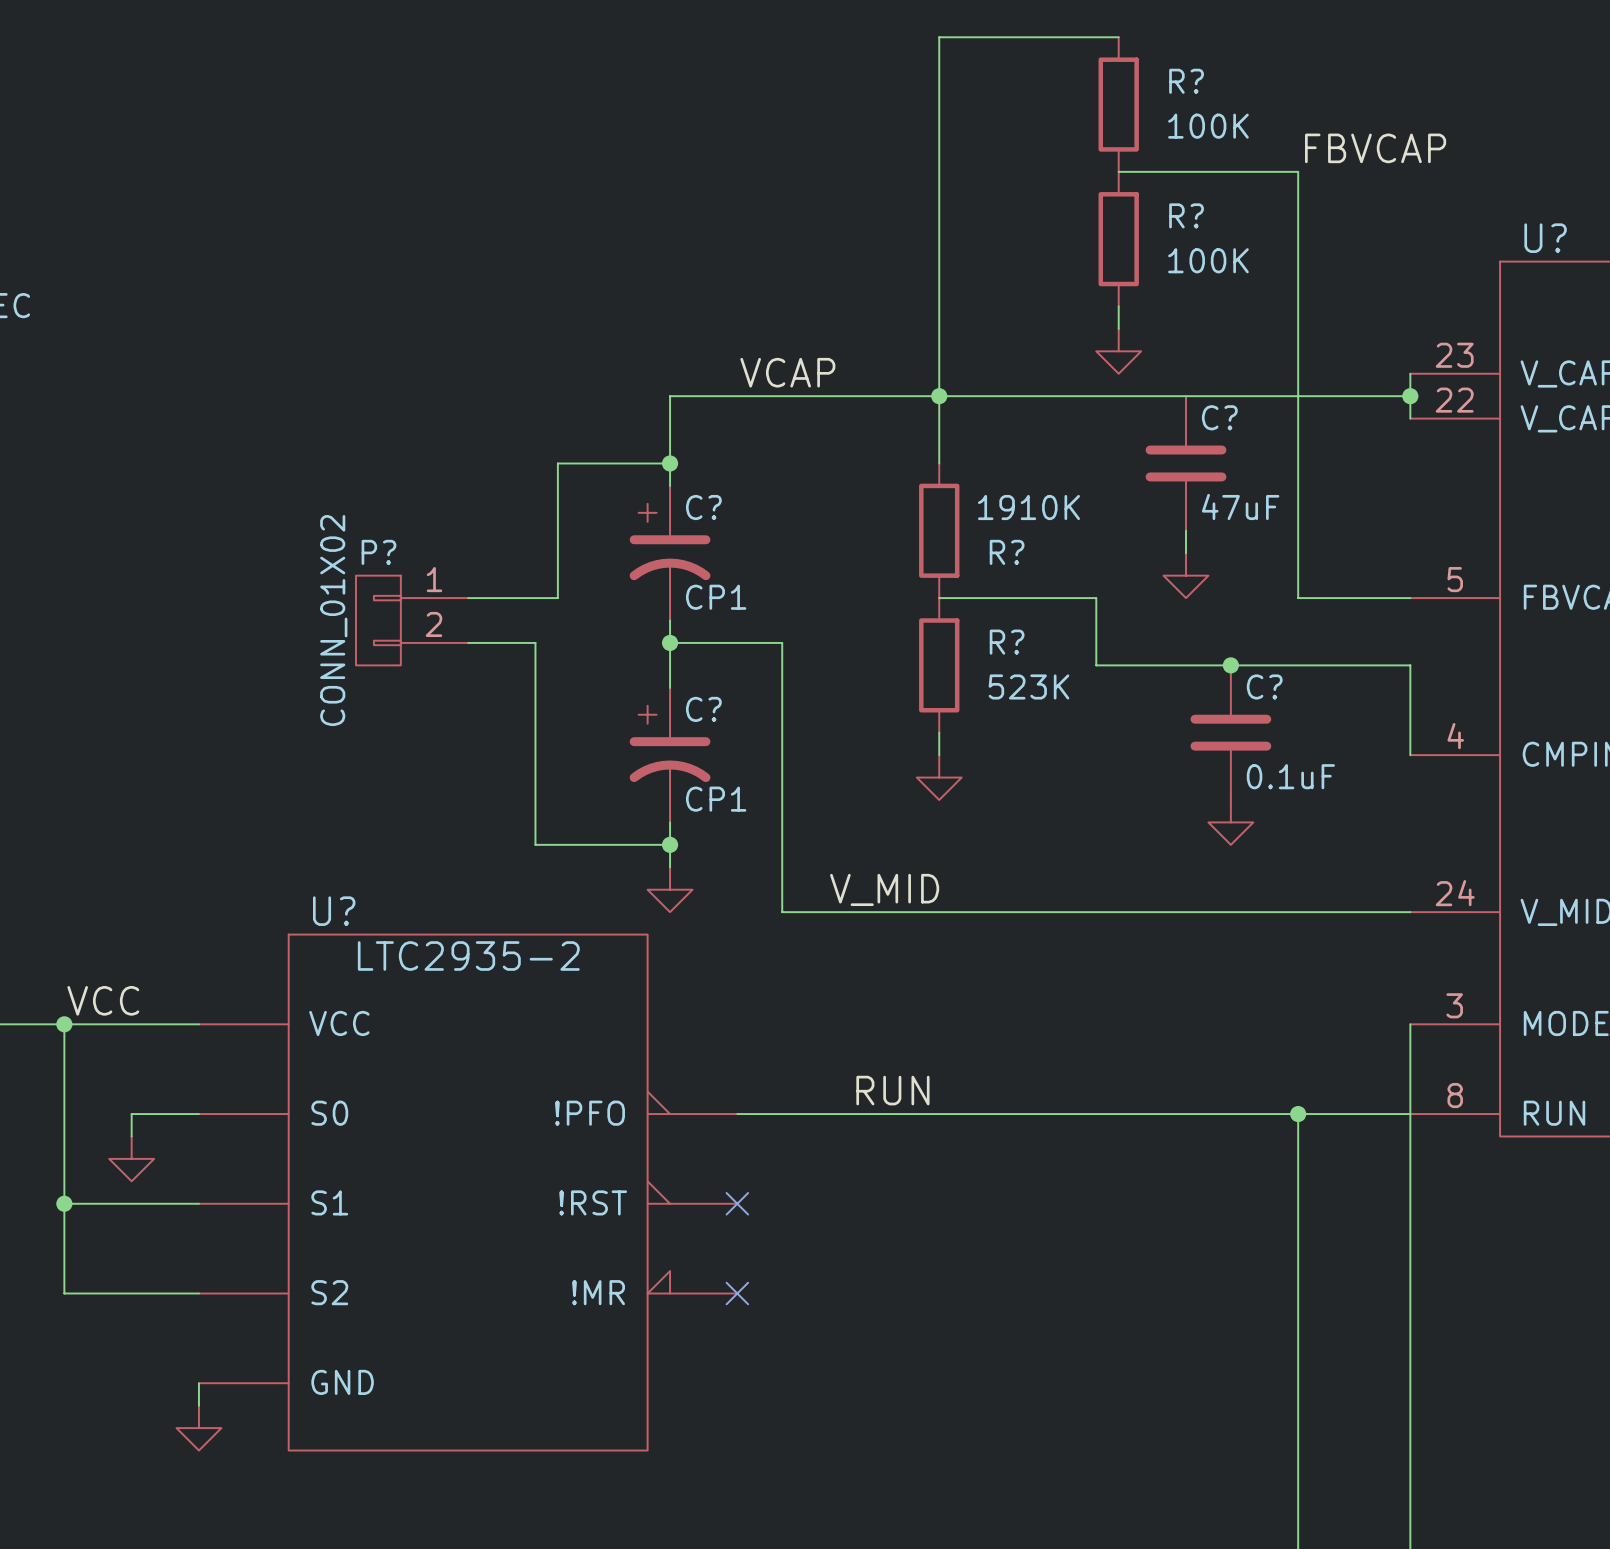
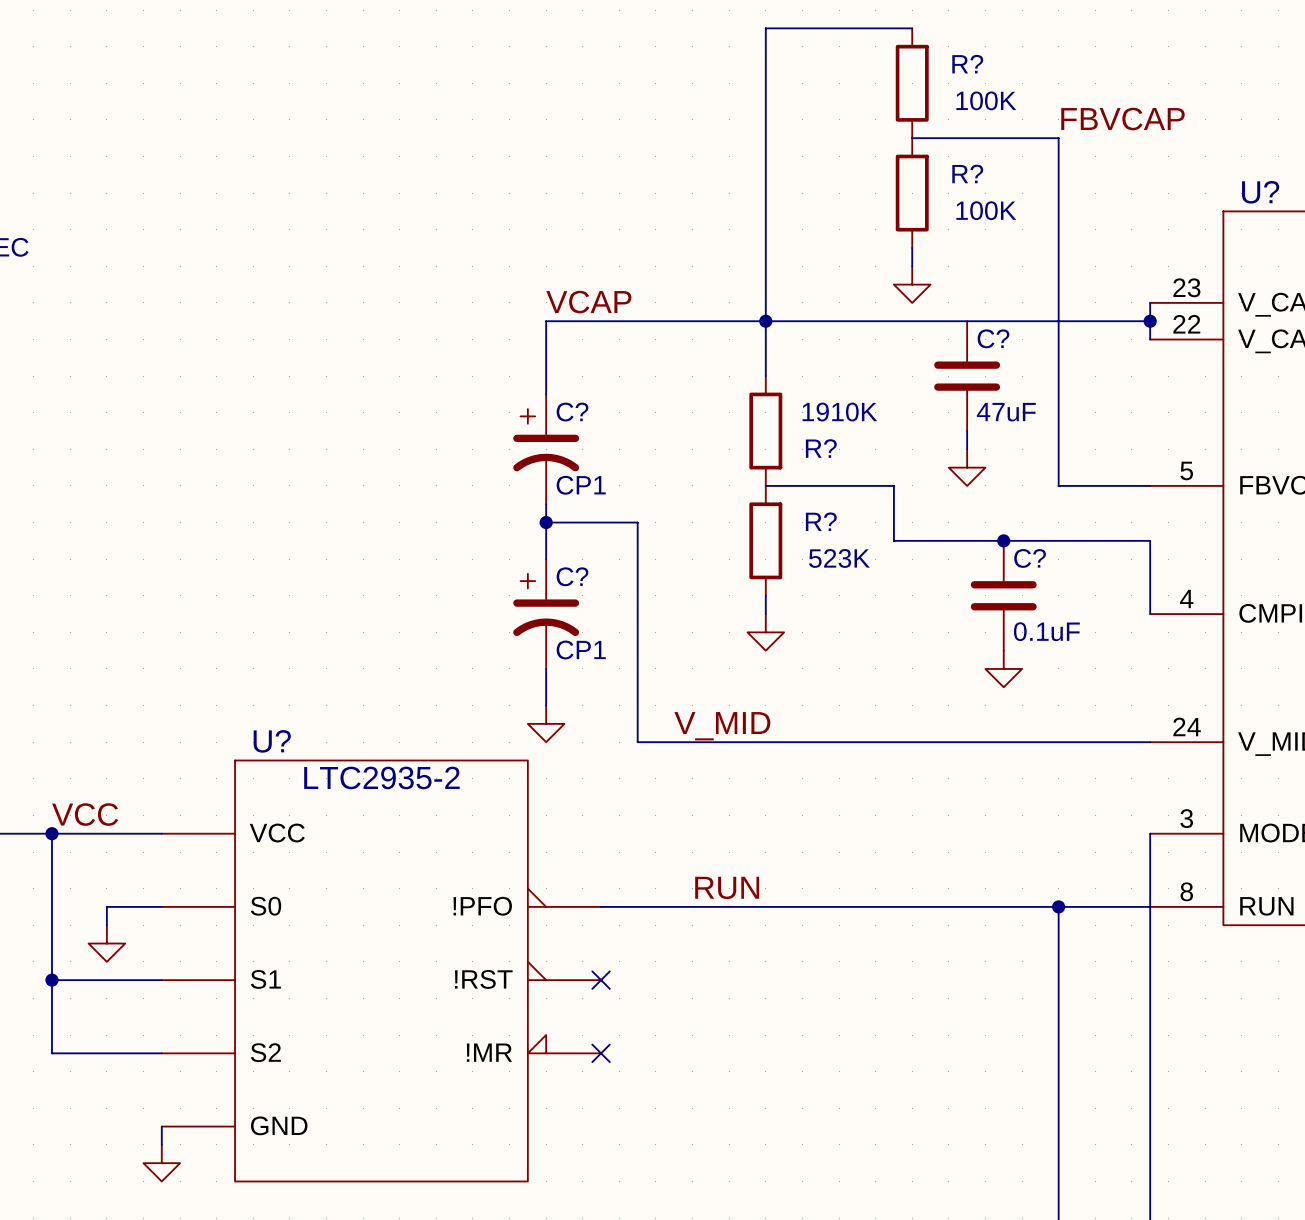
label position: VCAP (787, 372) -> VCAP (588, 302)
wire: (670, 463) (557, 463) (557, 598) (468, 598) -> none
junction: (670, 463) -> none
P?: CONN_01X02 (412, 620) -> none
wire: (468, 642) (535, 642) (535, 844) (670, 844) -> none
junction: (670, 844) -> none

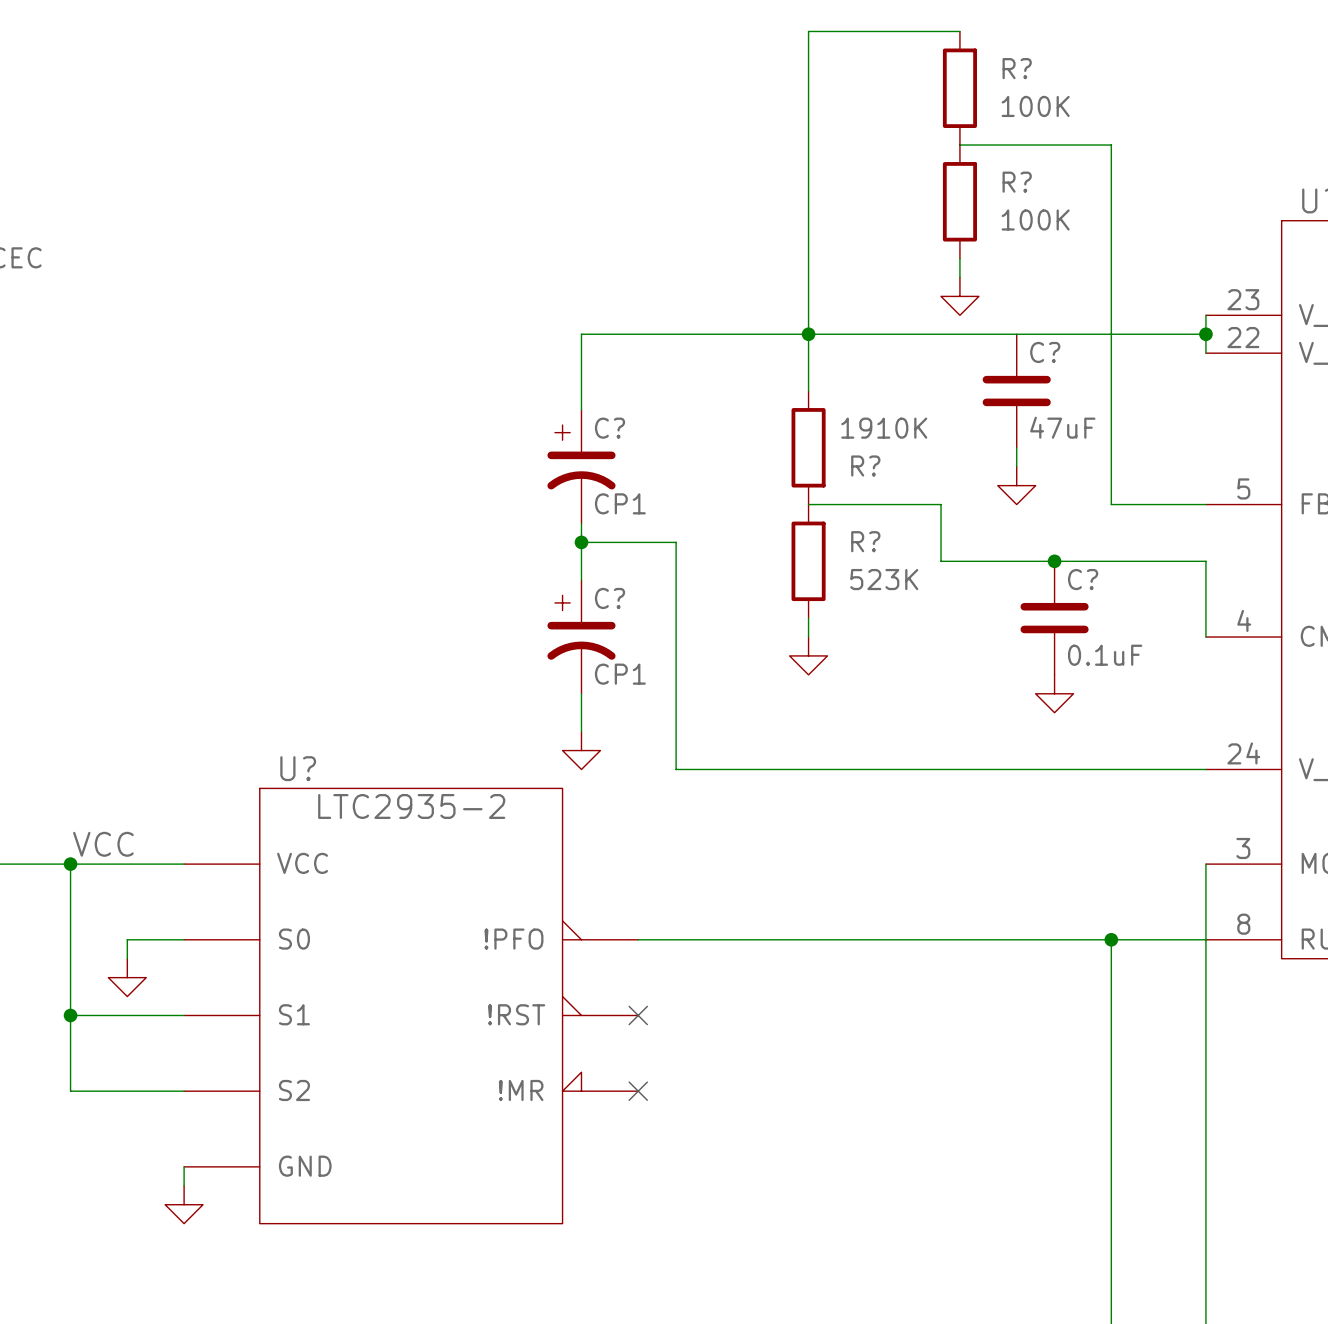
label: FBVCAP (1122, 119) -> none
label: VCAP (588, 302) -> none
label: V_MID (722, 726) -> none
label: RUN (727, 887) -> none

